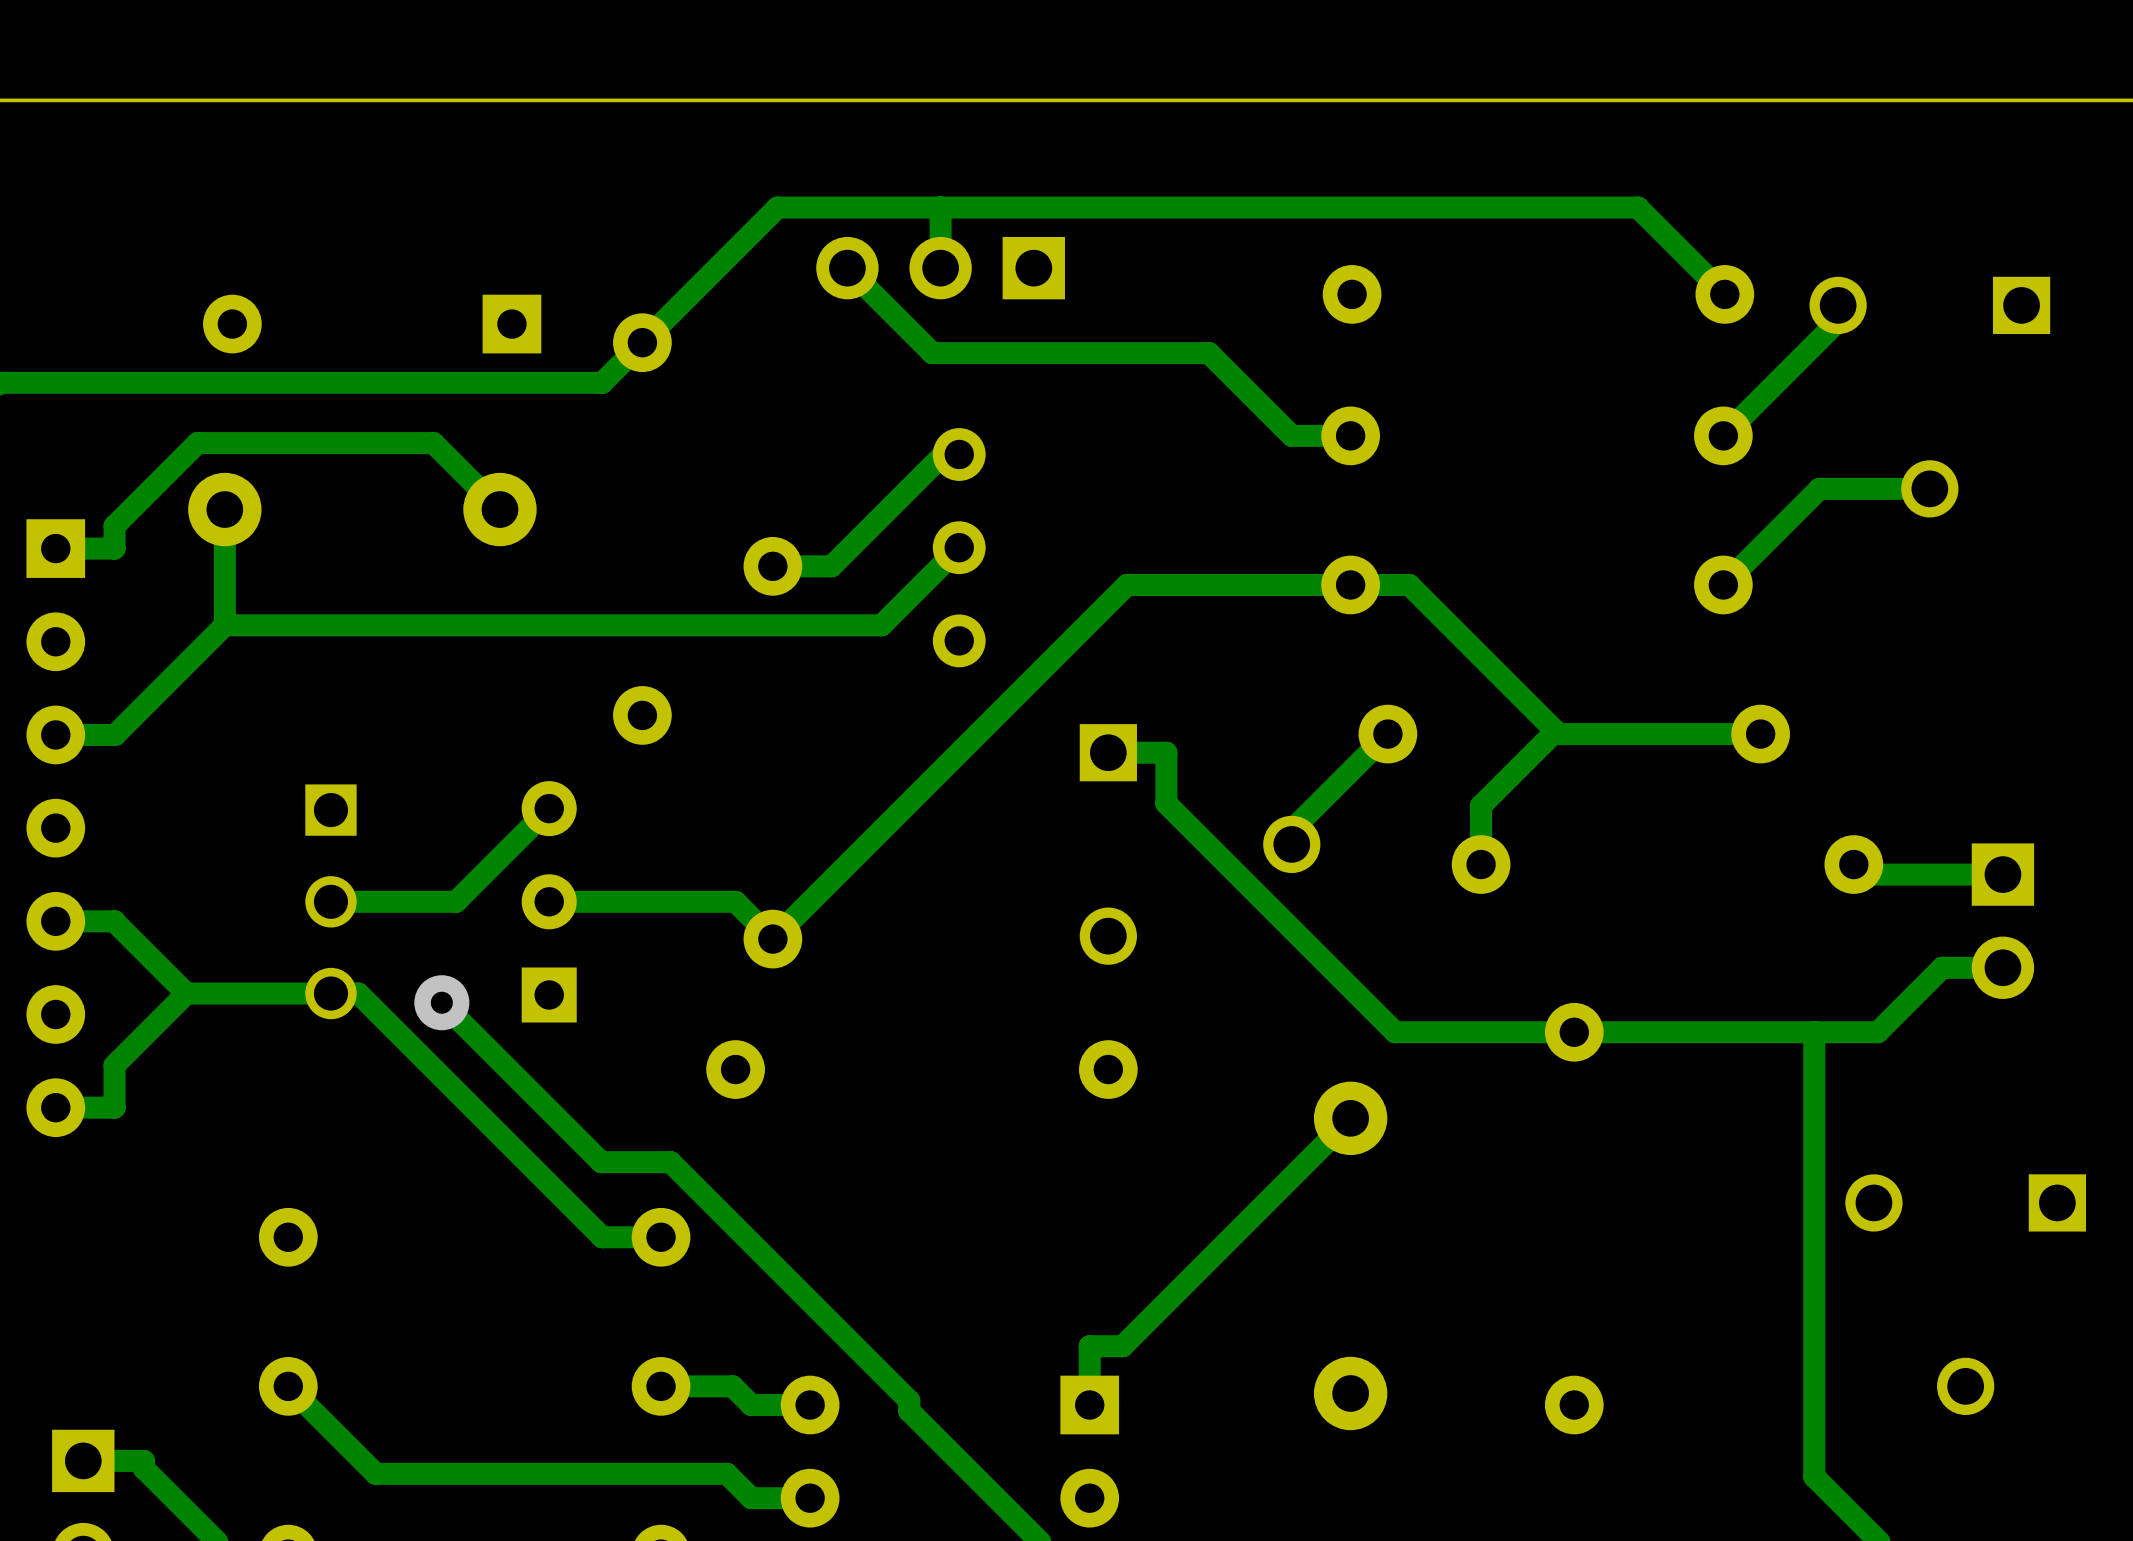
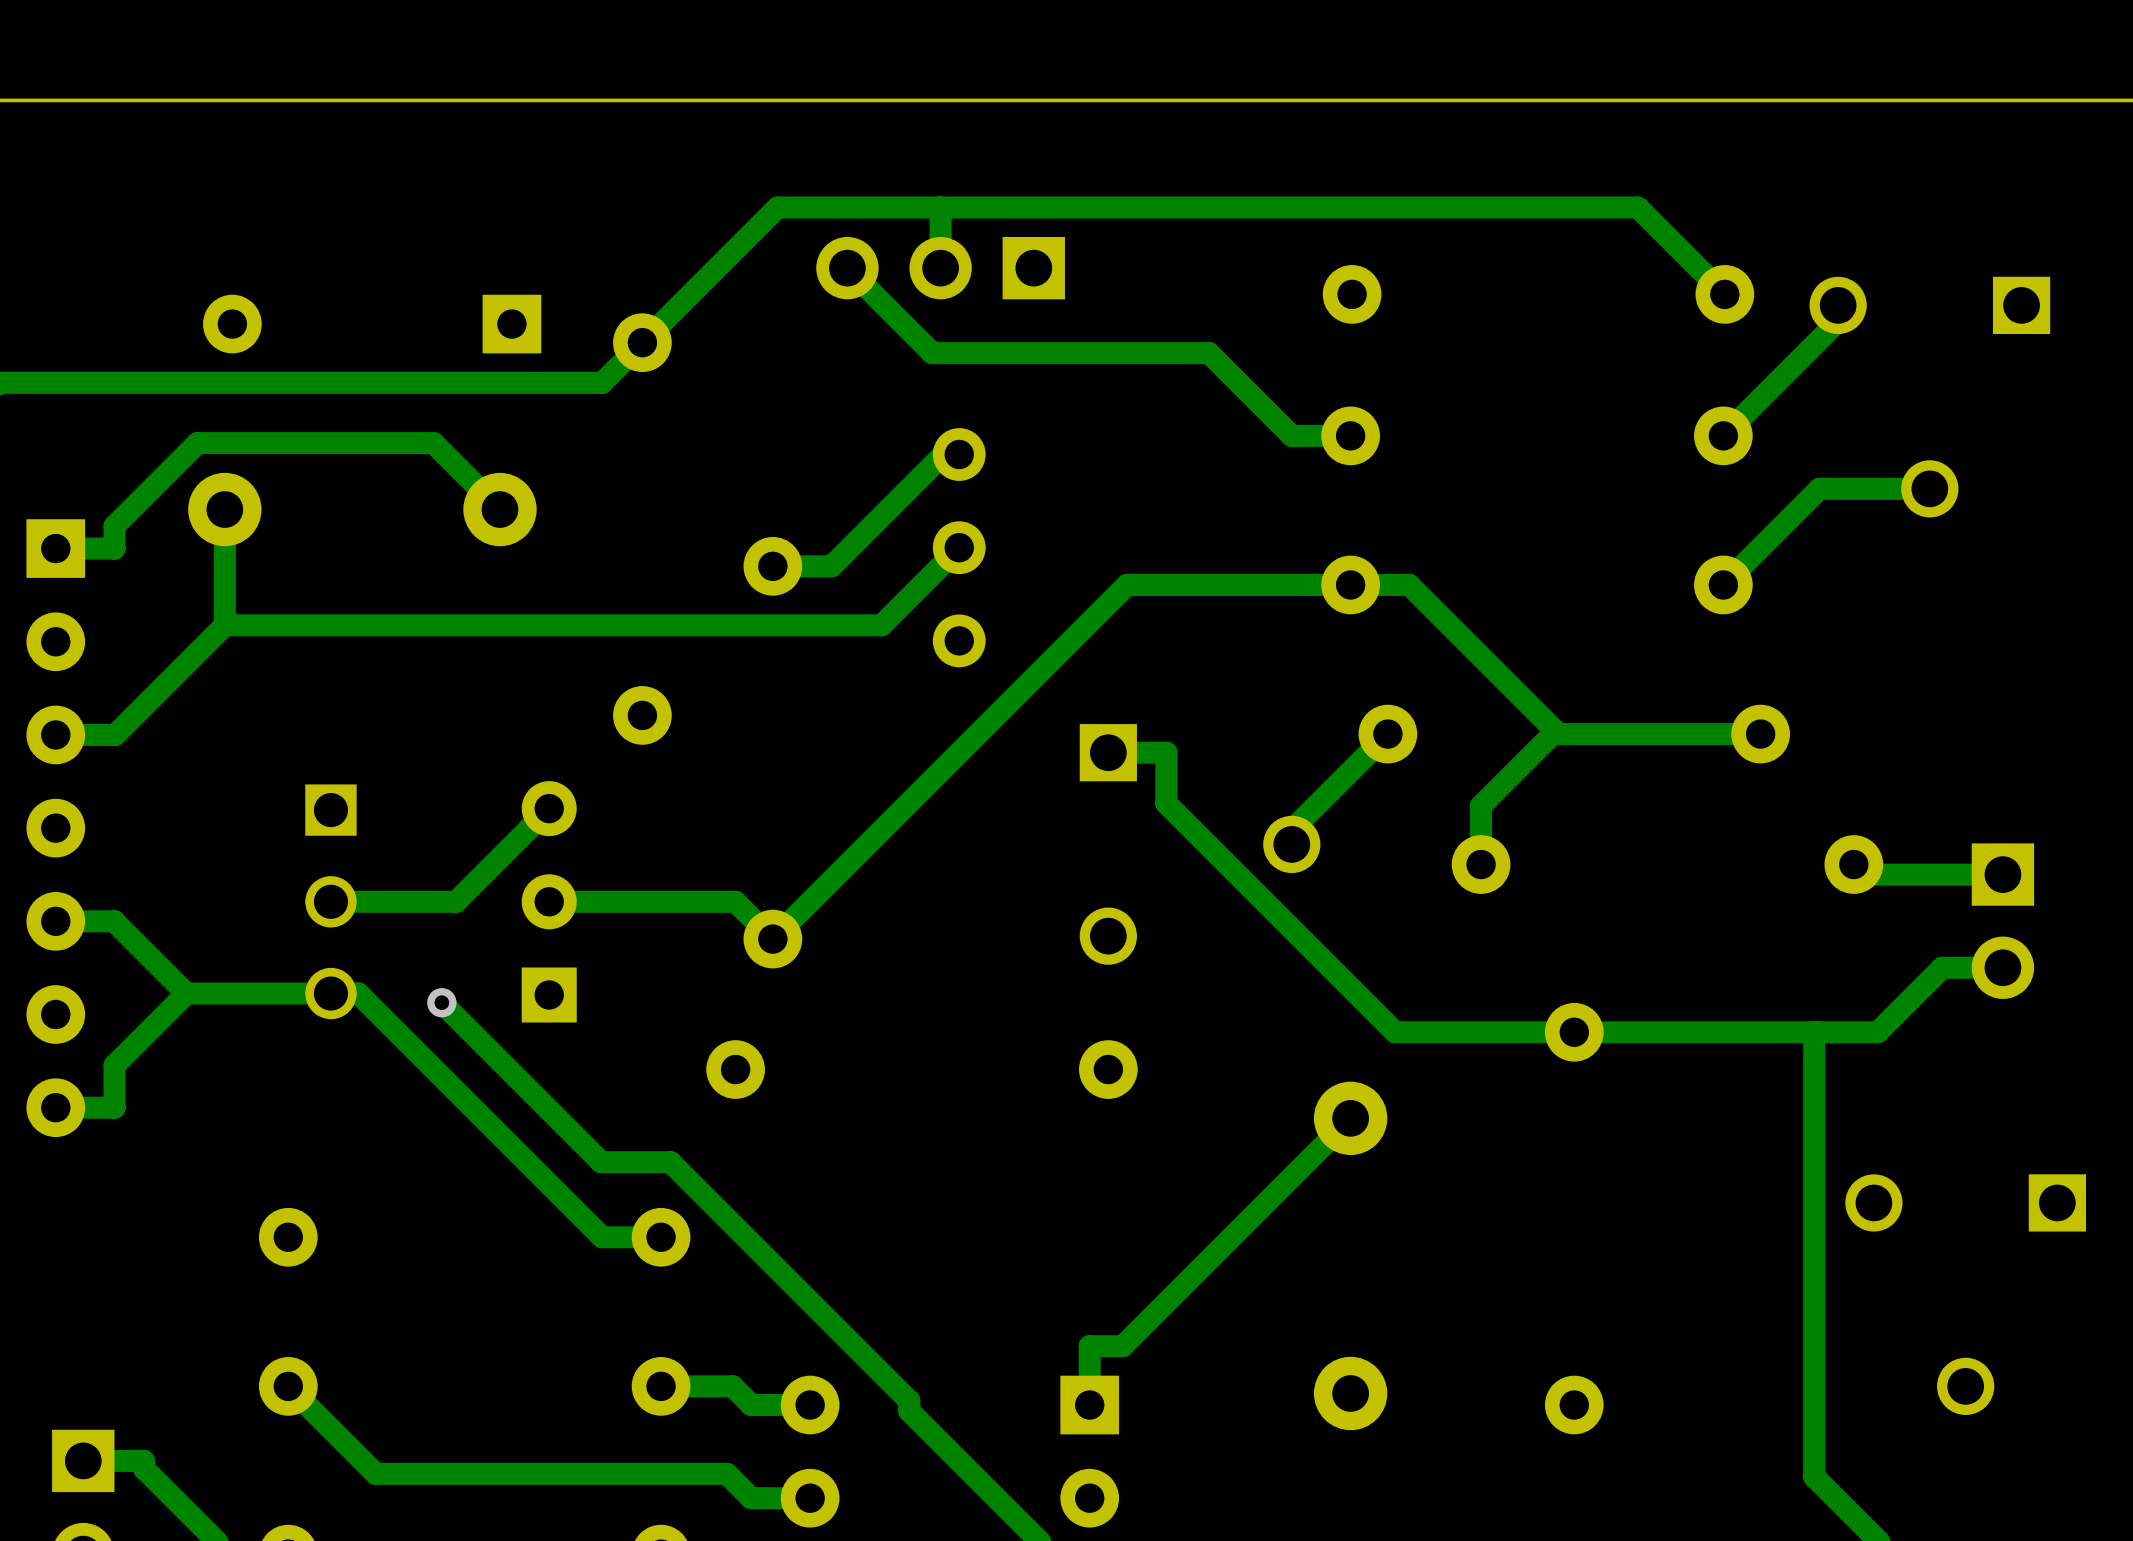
via size: [414, 975, 470, 1031] -> [427, 988, 457, 1018]

